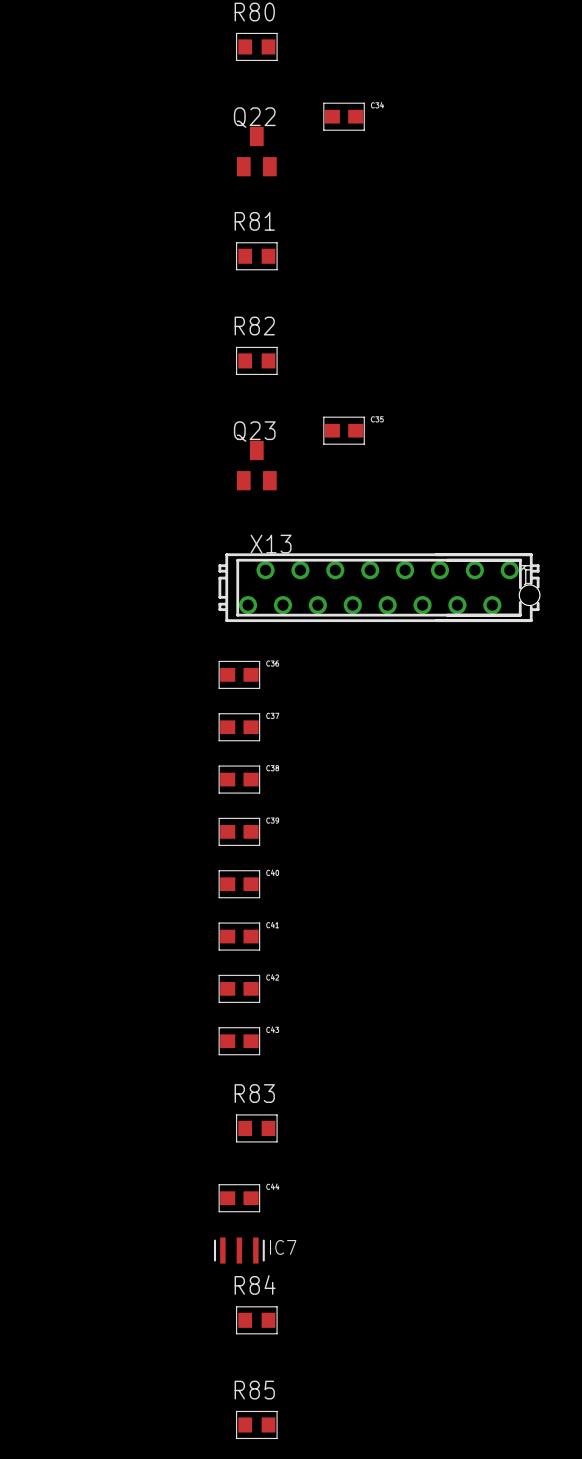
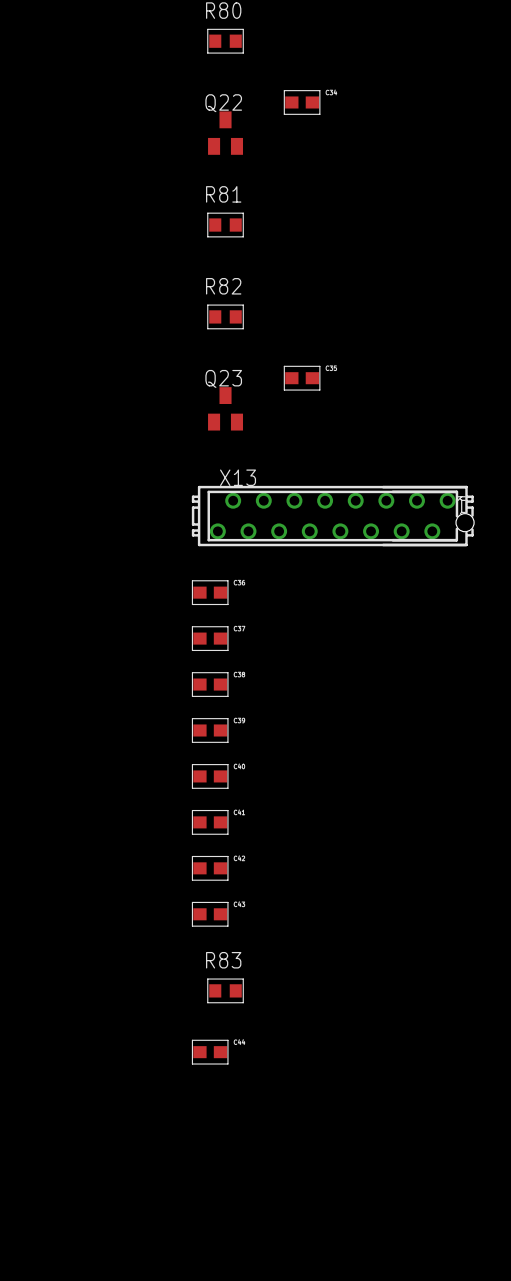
IC7: (239, 1250) -> none
R84: (256, 1320) -> none
R85: (256, 1424) -> none

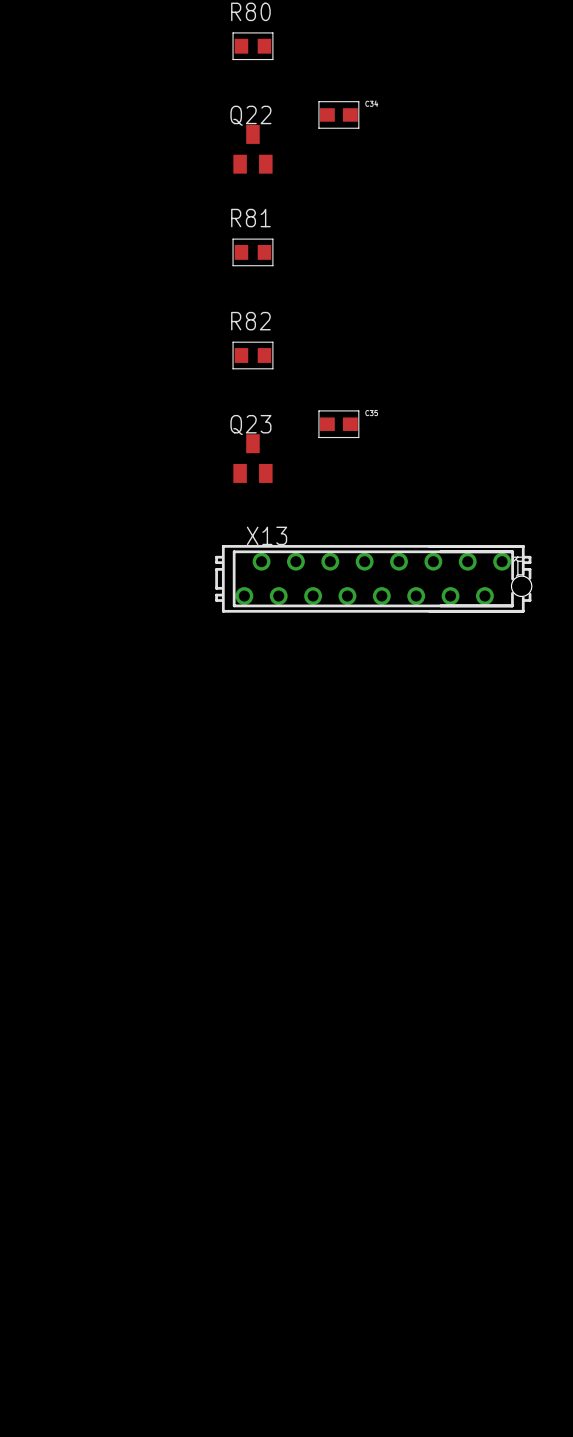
part: (210, 592) -> none
part: (210, 638) -> none
part: (210, 684) -> none
part: (210, 730) -> none
part: (210, 776) -> none
part: (210, 822) -> none
part: (210, 868) -> none
part: (210, 914) -> none
R83: (225, 990) -> none
part: (210, 1052) -> none

